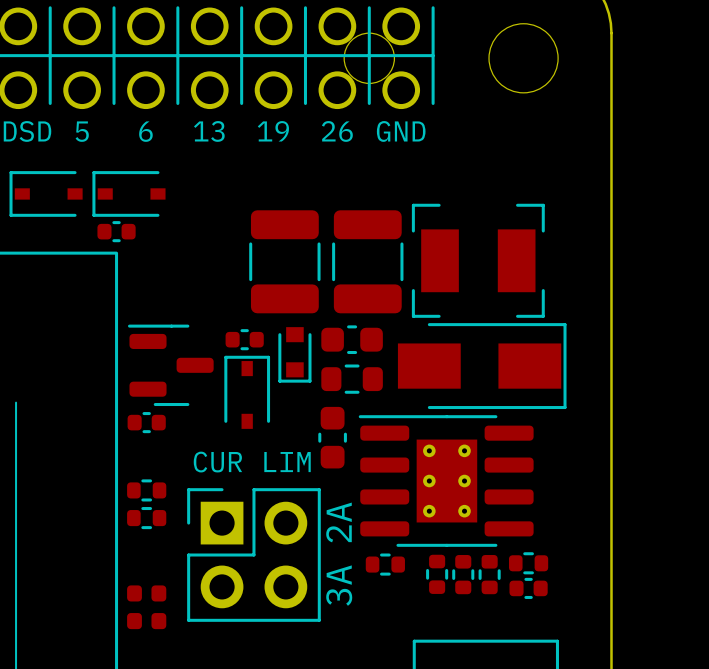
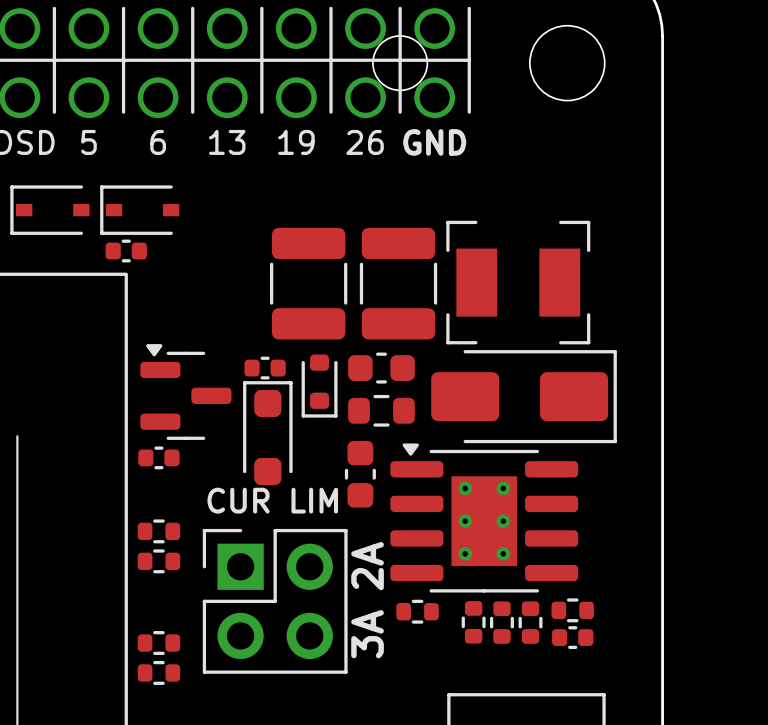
part footprint: [397, 323, 567, 410] -> [431, 350, 617, 444]
part footprint: [127, 324, 214, 407] -> [140, 344, 232, 440]
part footprint: [278, 327, 312, 383] -> [301, 354, 338, 418]
part footprint: [224, 355, 271, 429] -> [243, 381, 293, 486]
part footprint: [358, 415, 534, 547] -> [390, 443, 579, 593]
part footprint: [127, 585, 167, 602] -> [137, 631, 181, 655]
part footprint: [127, 613, 167, 630] -> [137, 660, 181, 685]

